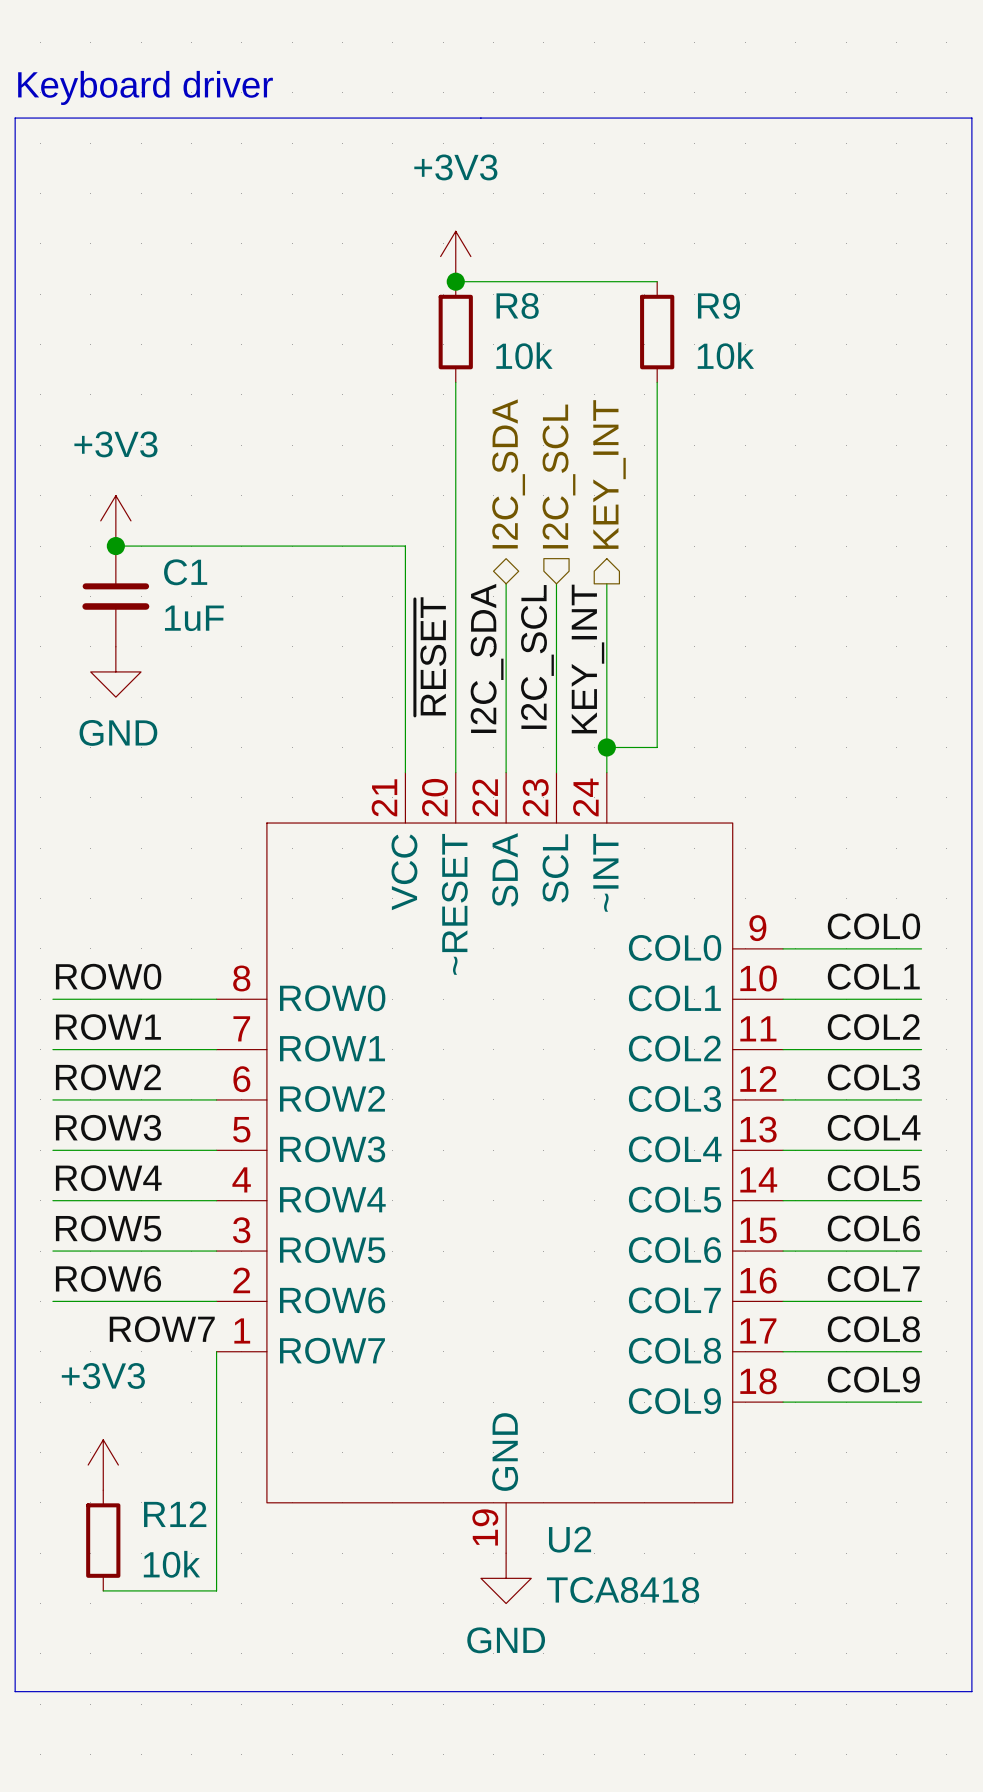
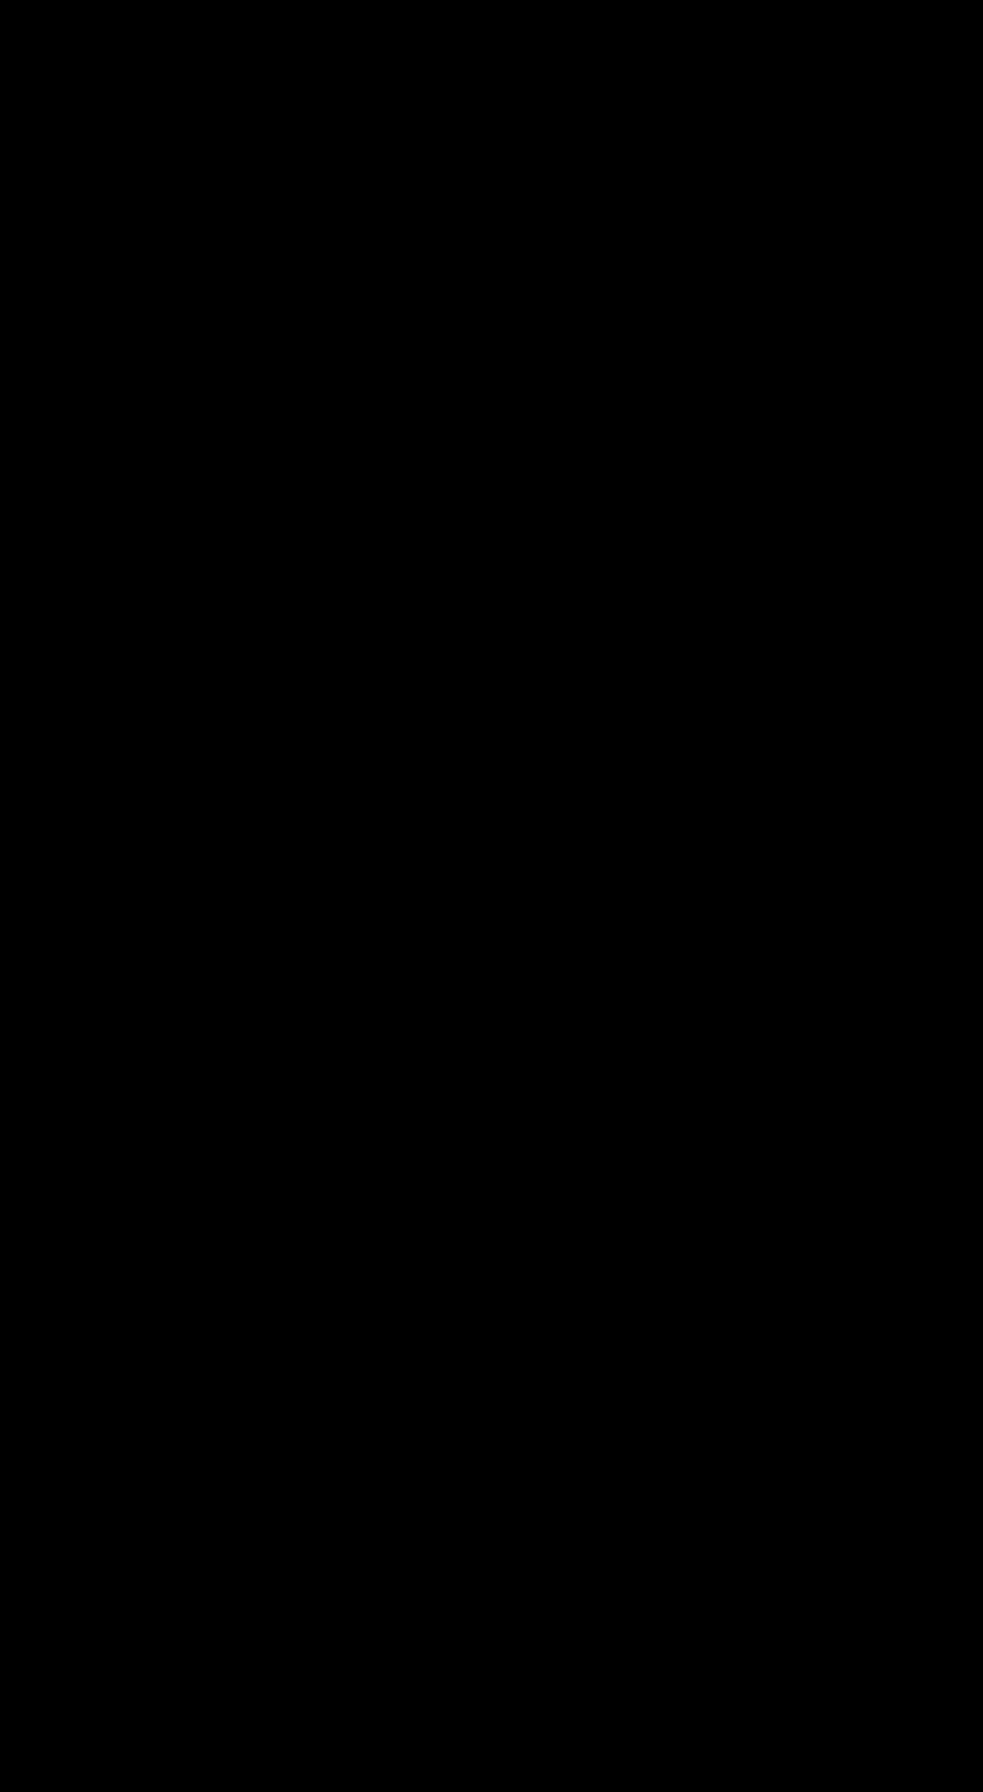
text: Keyboard driver (145, 87) -> none
line: (15, 118) (971, 118) (971, 1691) (15, 1691) (15, 118) -> none
power symbol: +3V3 (455, 256) -> none
wire: (455, 281) (657, 281) -> none
junction: (455, 281) -> none
R8: 10k (455, 332) -> none
R9: 10k (657, 332) -> none
wire: (455, 382) (455, 772) -> none
wire: (657, 382) (657, 747) (606, 747) -> none
hierarchical label: I2C_SDA (508, 473) -> none
hierarchical label: KEY_INT (609, 474) -> none
hierarchical label: I2C_SCL (558, 476) -> none
power symbol: +3V3 (115, 520) -> none
wire: (115, 546) (405, 546) (405, 772) -> none
junction: (115, 546) -> none
wire: (506, 583) (506, 772) -> none
wire: (556, 583) (556, 772) -> none
wire: (606, 583) (606, 772) -> none
C1: 1uF (115, 596) -> none
label: ~{RESET} (430, 656) -> none
label: I2C_SCL (537, 656) -> none
label: I2C_SDA (487, 658) -> none
label: KEY_INT (587, 659) -> none
power symbol: GND (115, 671) -> none
junction: (606, 747) -> none
label: COL0 (873, 926) -> none
wire: (783, 948) (921, 948) -> none
label: ROW0 (108, 976) -> none
label: COL1 (873, 976) -> none
wire: (52, 999) (216, 999) -> none
wire: (783, 999) (921, 999) -> none
label: ROW1 (108, 1027) -> none
label: COL2 (873, 1027) -> none
wire: (52, 1049) (216, 1049) -> none
wire: (783, 1049) (921, 1049) -> none
label: ROW2 (108, 1077) -> none
label: COL3 (873, 1077) -> none
wire: (52, 1099) (216, 1099) -> none
wire: (783, 1099) (921, 1099) -> none
label: ROW3 (108, 1127) -> none
label: COL4 (874, 1127) -> none
wire: (52, 1150) (216, 1150) -> none
wire: (783, 1150) (921, 1150) -> none
U2: TCA8418 (499, 1162) -> none
label: ROW4 (108, 1178) -> none
label: COL5 (873, 1178) -> none
wire: (52, 1200) (216, 1200) -> none
wire: (783, 1200) (921, 1200) -> none
label: ROW5 (108, 1228) -> none
label: COL6 (873, 1228) -> none
wire: (52, 1251) (216, 1251) -> none
wire: (783, 1251) (921, 1251) -> none
label: ROW6 (108, 1278) -> none
label: COL7 (873, 1278) -> none
wire: (52, 1301) (216, 1301) -> none
wire: (783, 1301) (921, 1301) -> none
label: ROW7 (162, 1329) -> none
label: COL8 (873, 1329) -> none
wire: (216, 1351) (216, 1590) (103, 1590) -> none
wire: (783, 1351) (921, 1351) -> none
label: COL9 (873, 1379) -> none
wire: (783, 1402) (921, 1402) -> none
power symbol: +3V3 (103, 1465) -> none
R12: 10k (103, 1540) -> none
power symbol: GND (506, 1578) -> none

